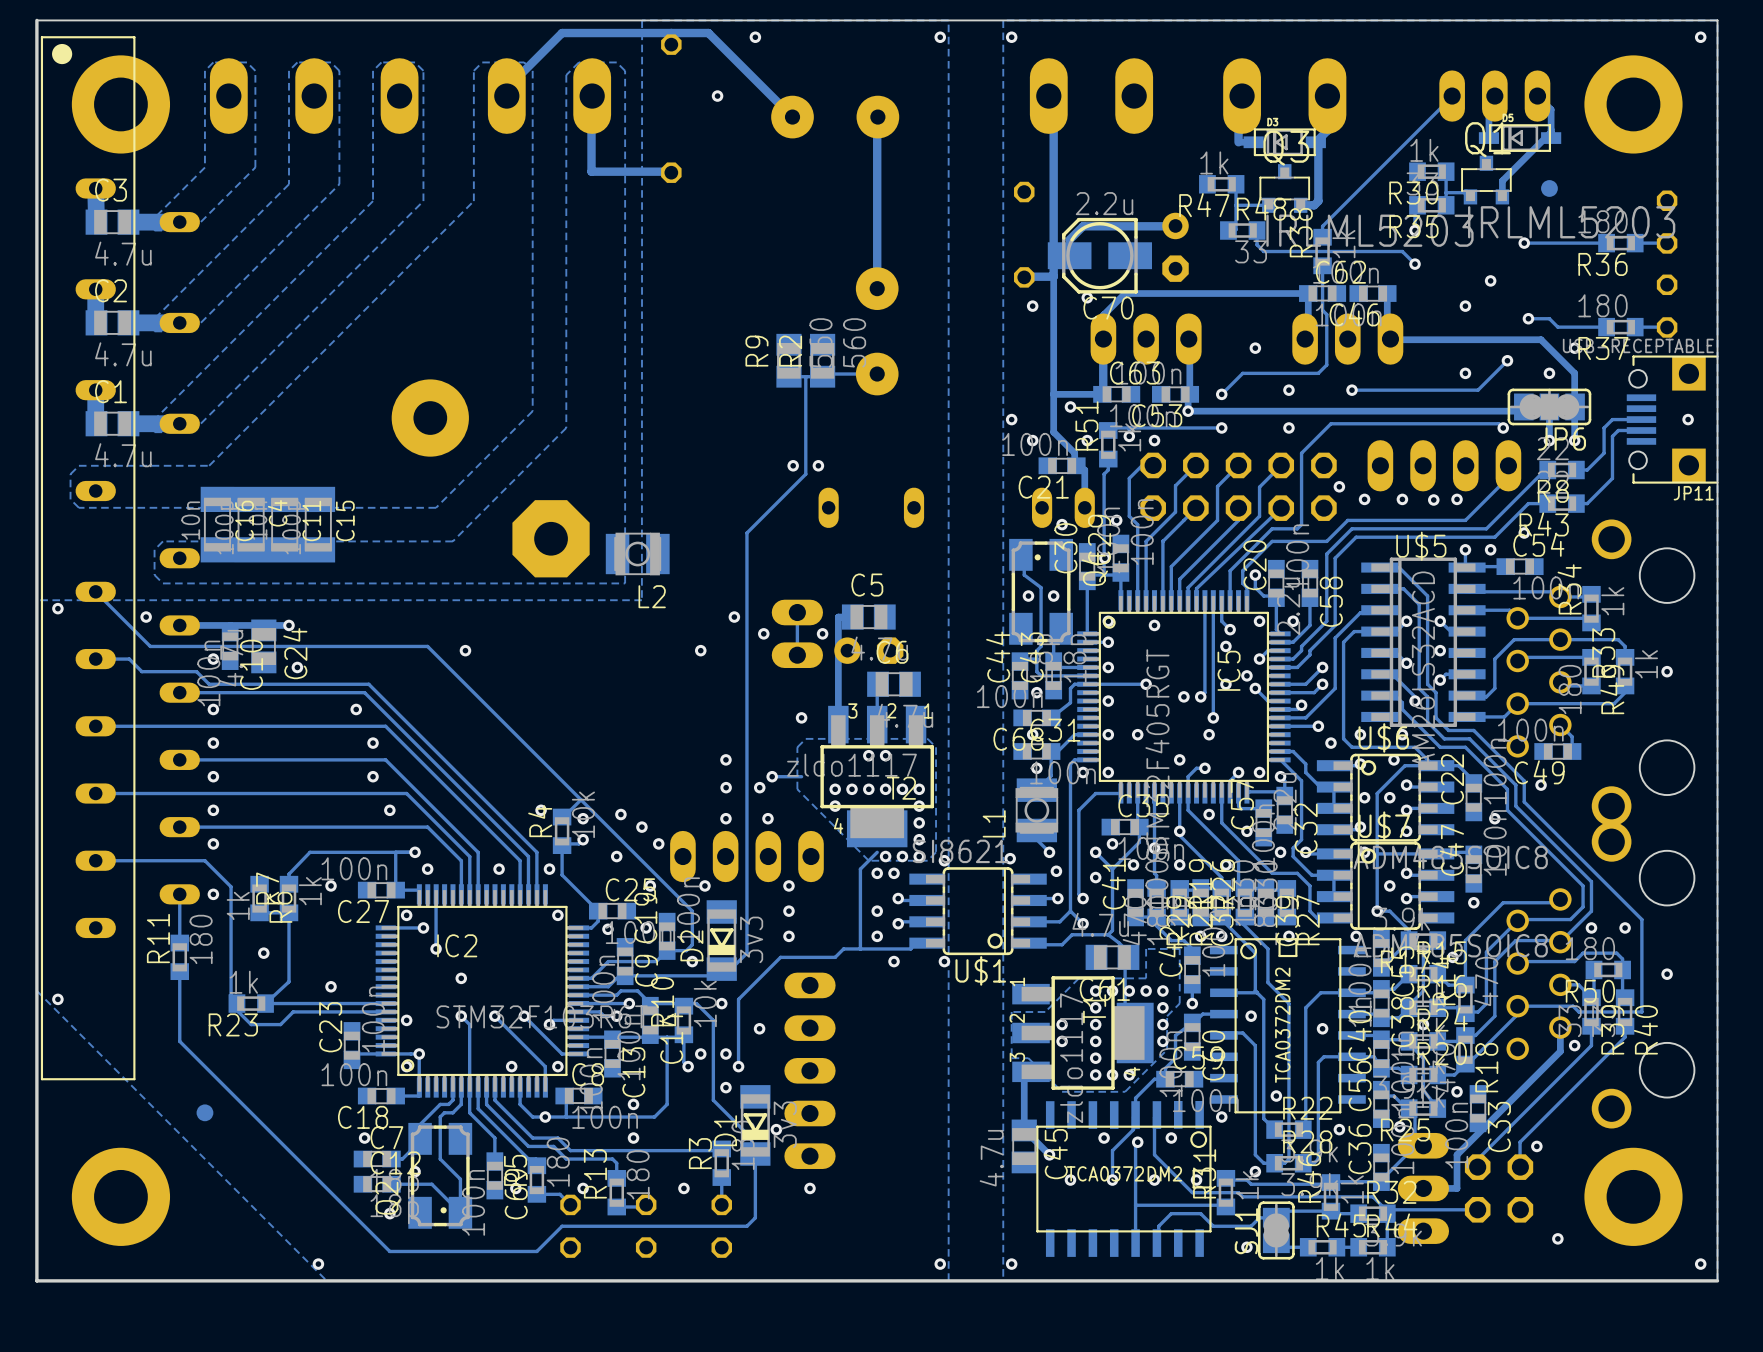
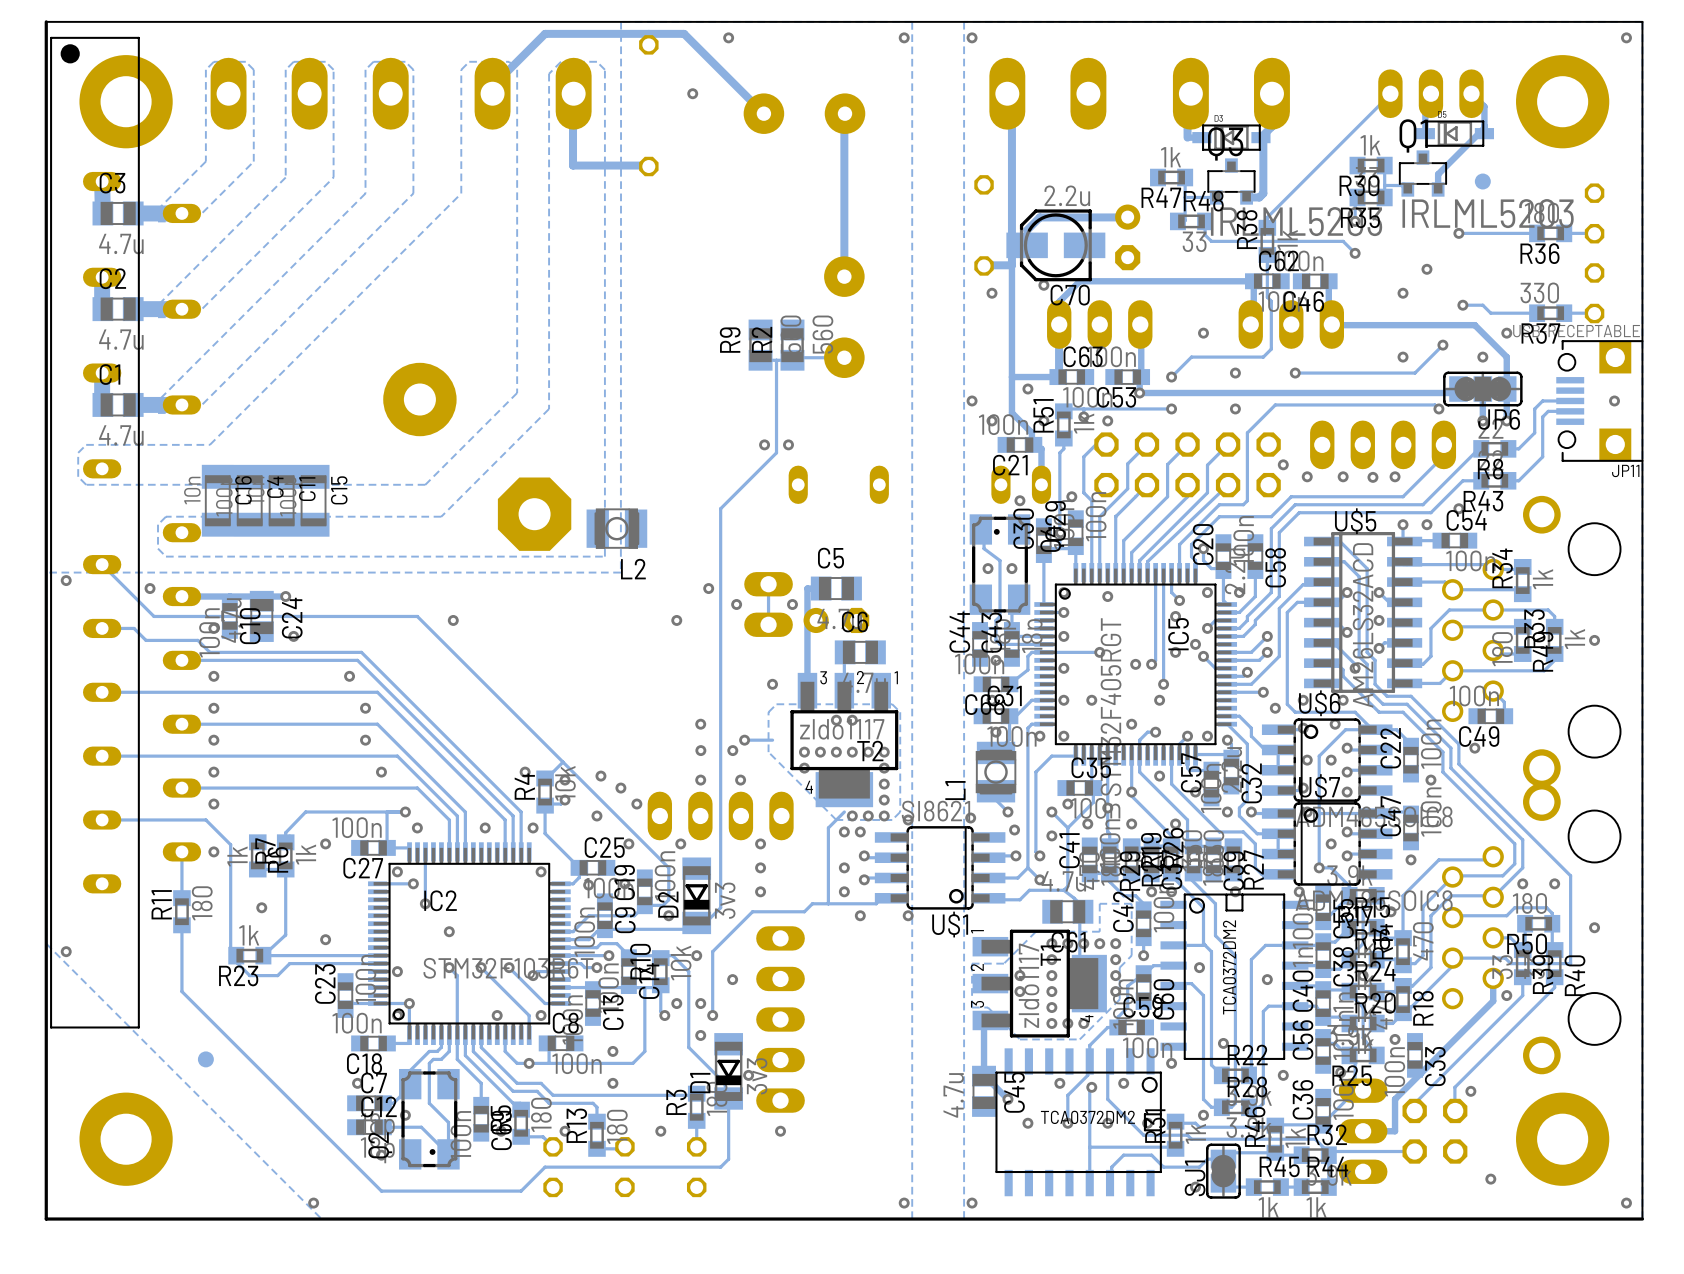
R37 value: 180 (1602, 305) -> 330 (1539, 292)

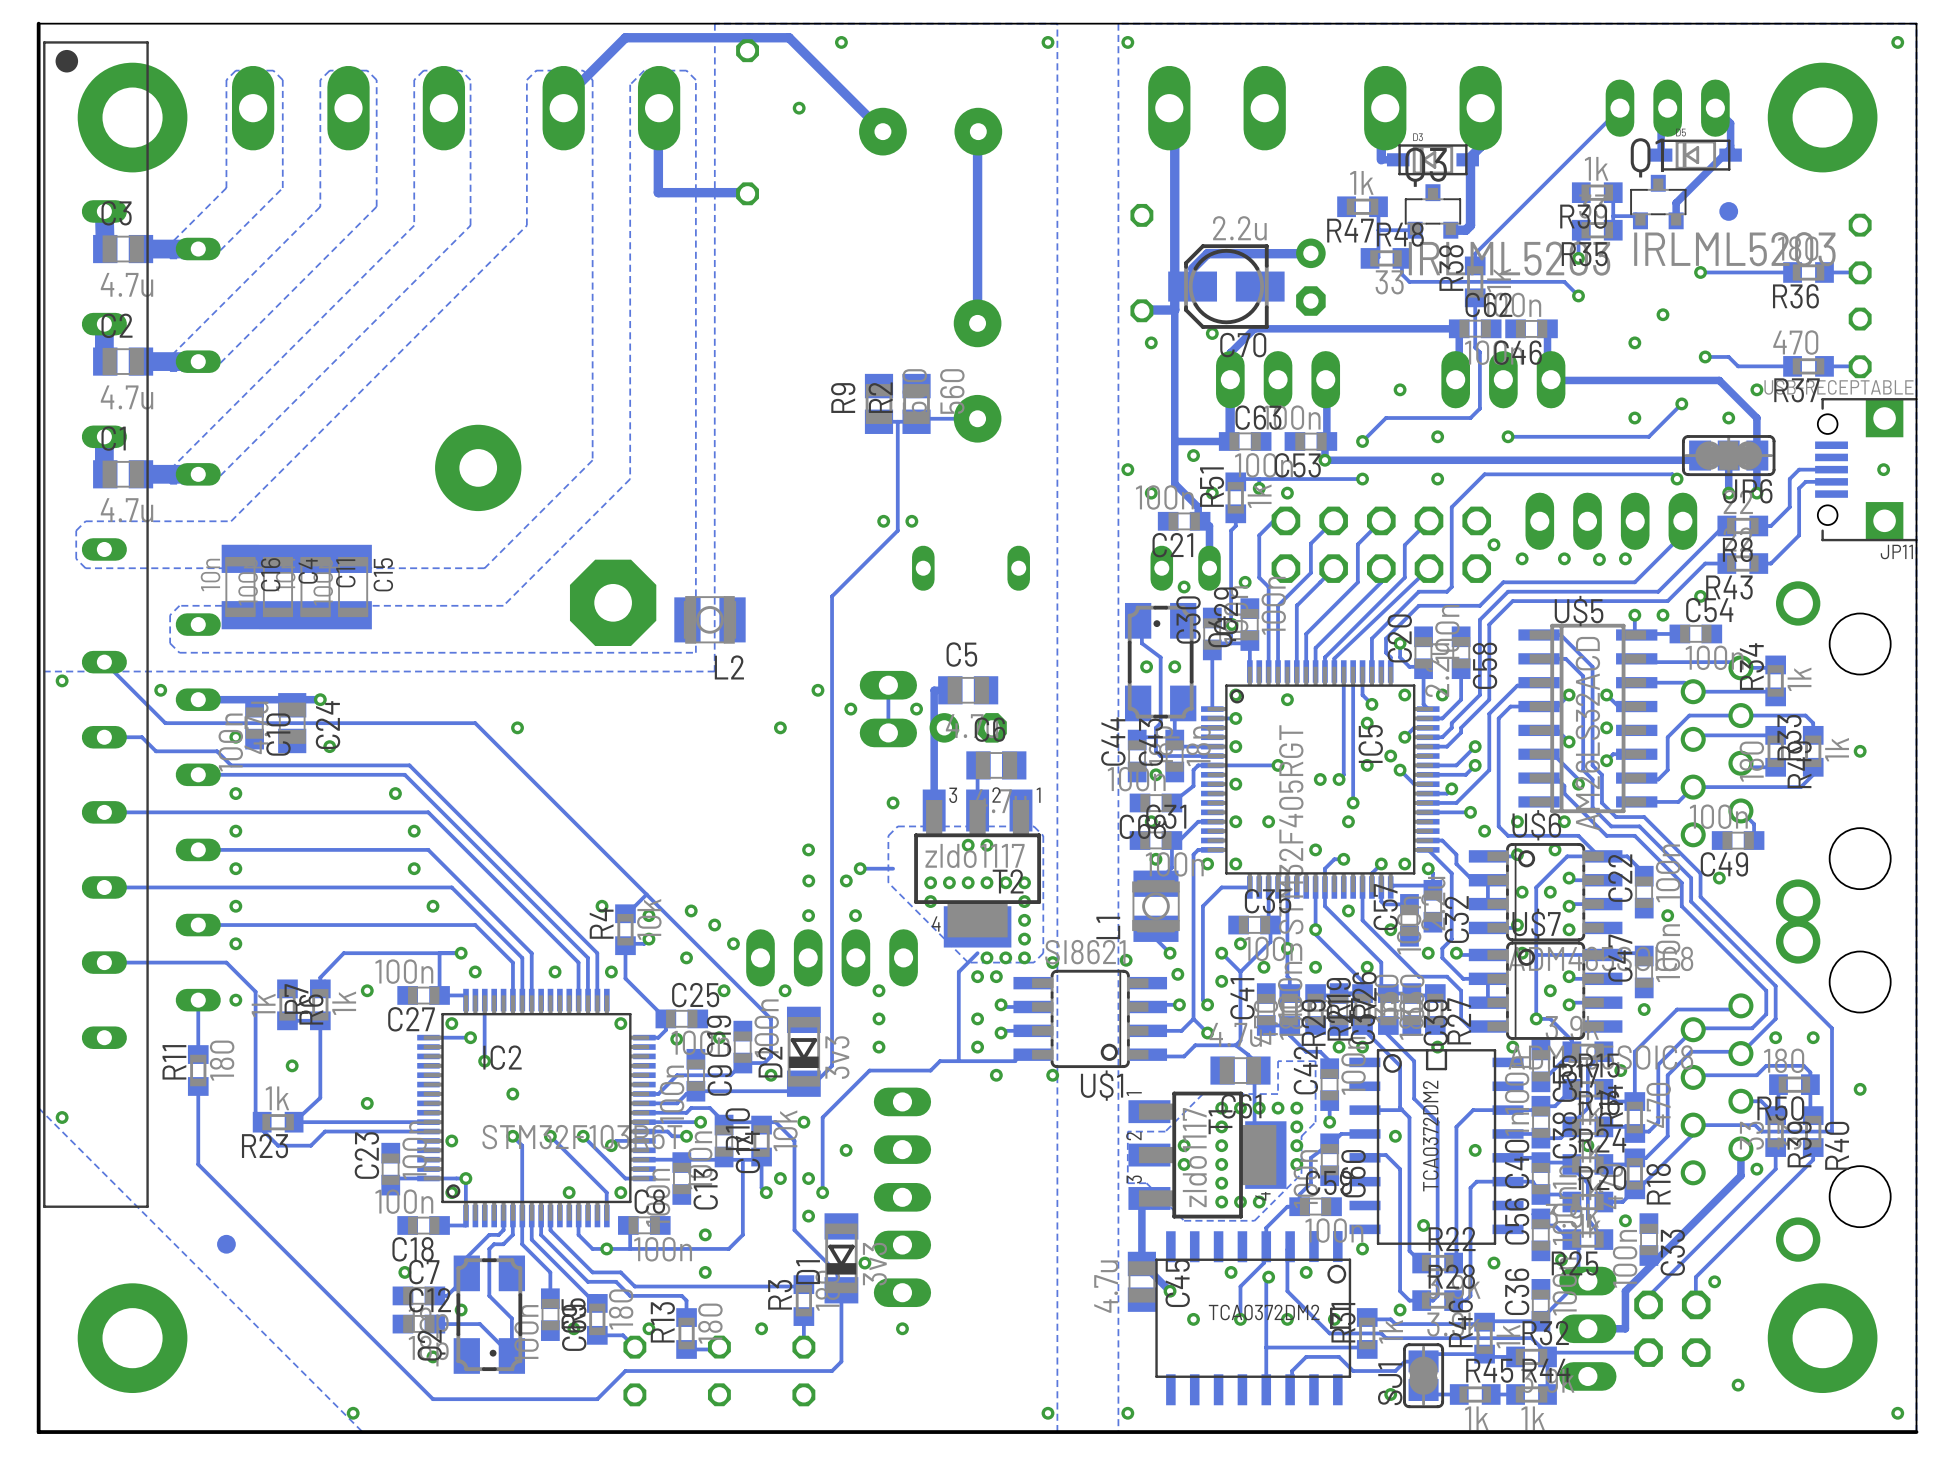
R37 value: 330 (1539, 292) -> 470 (1795, 342)

